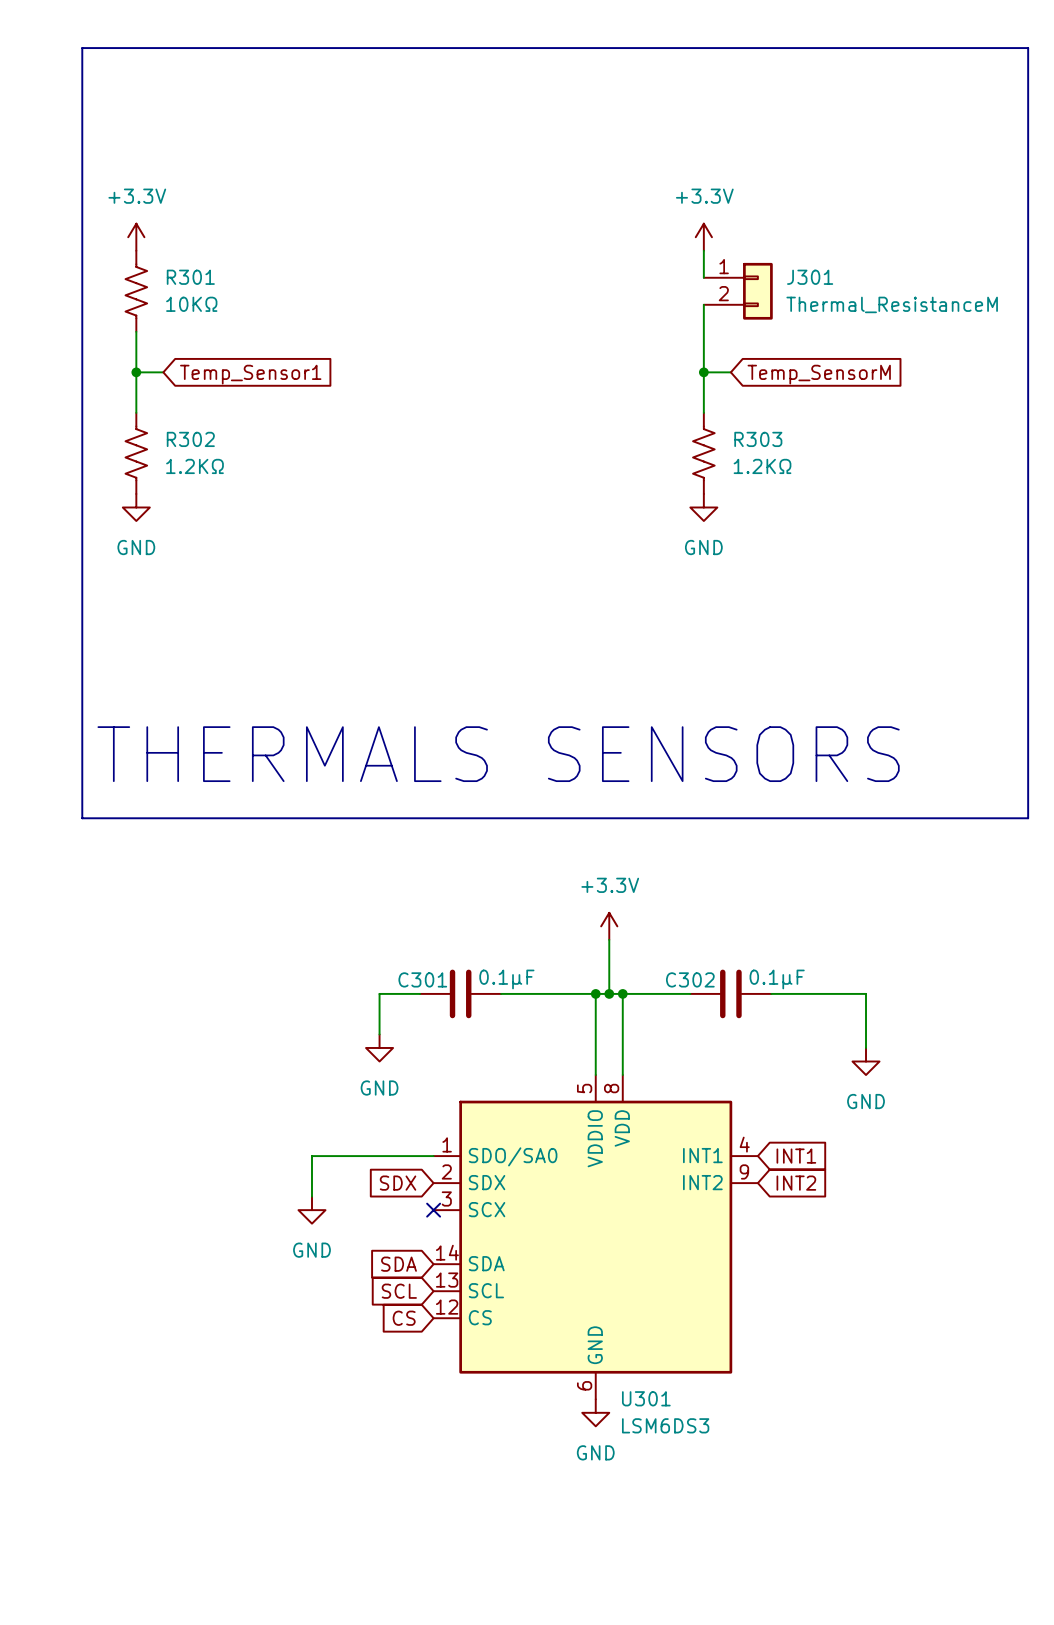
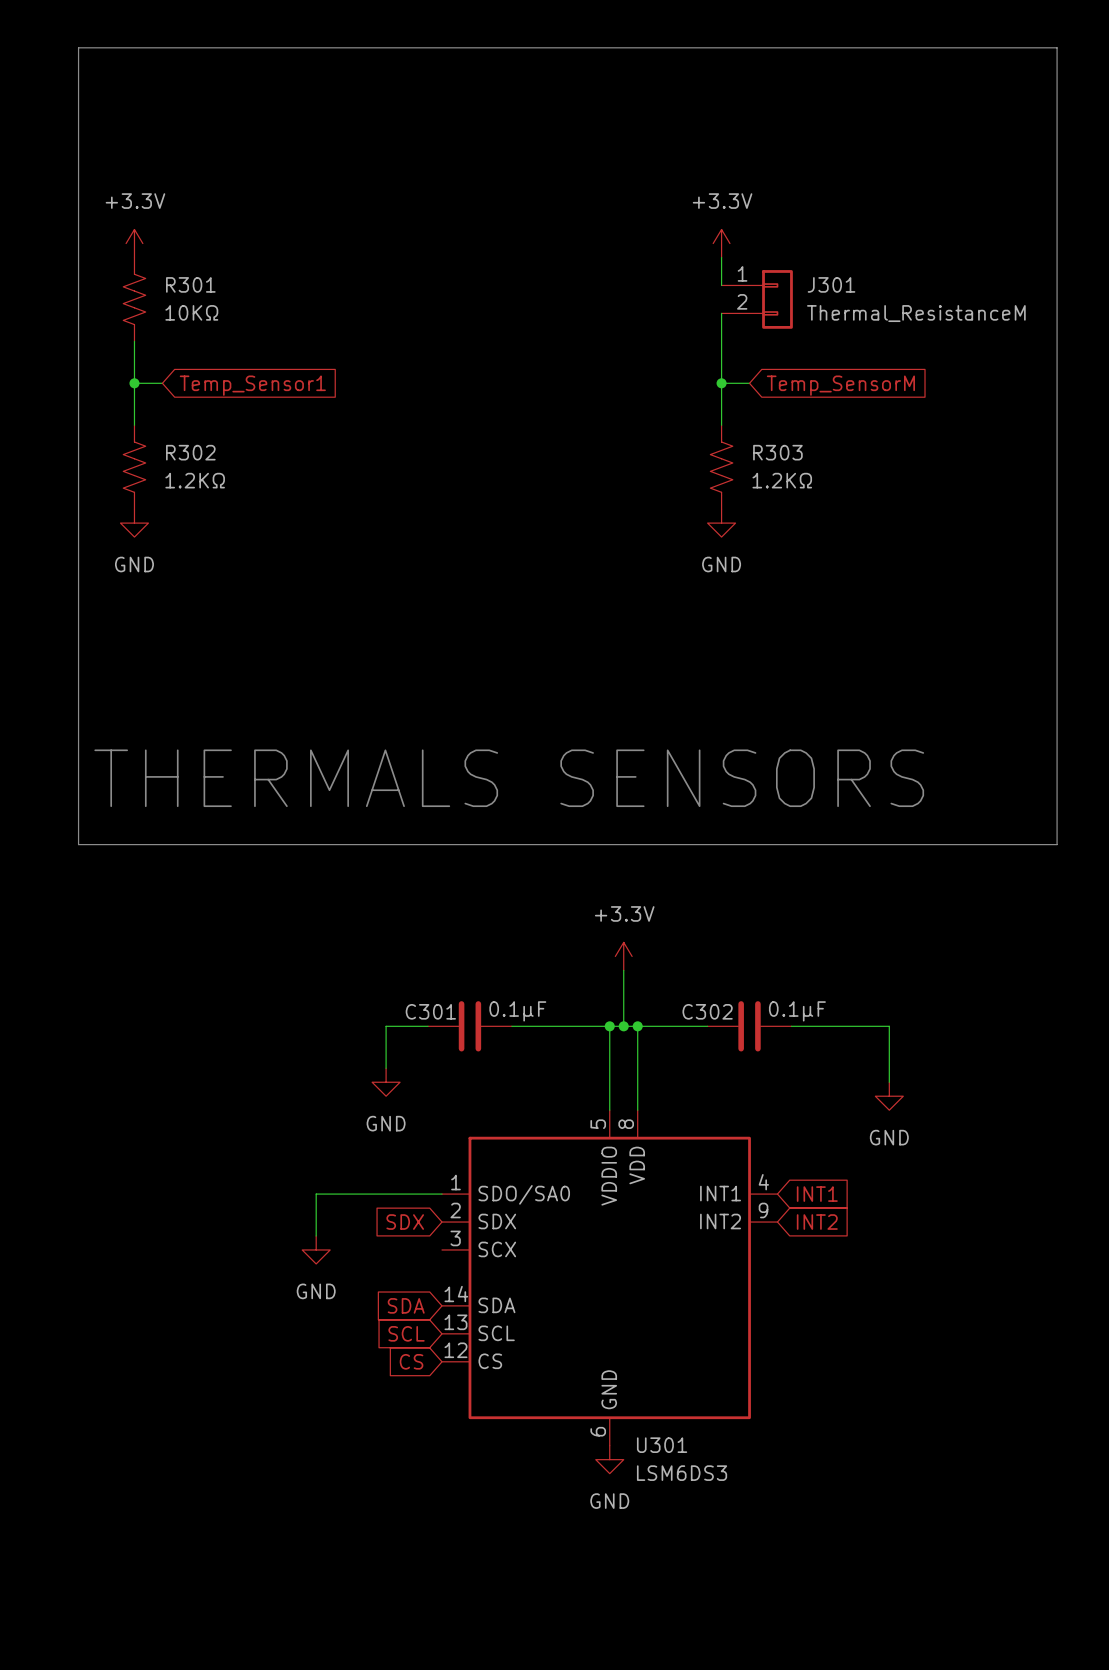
no-connect mark: (433, 1210) -> none

